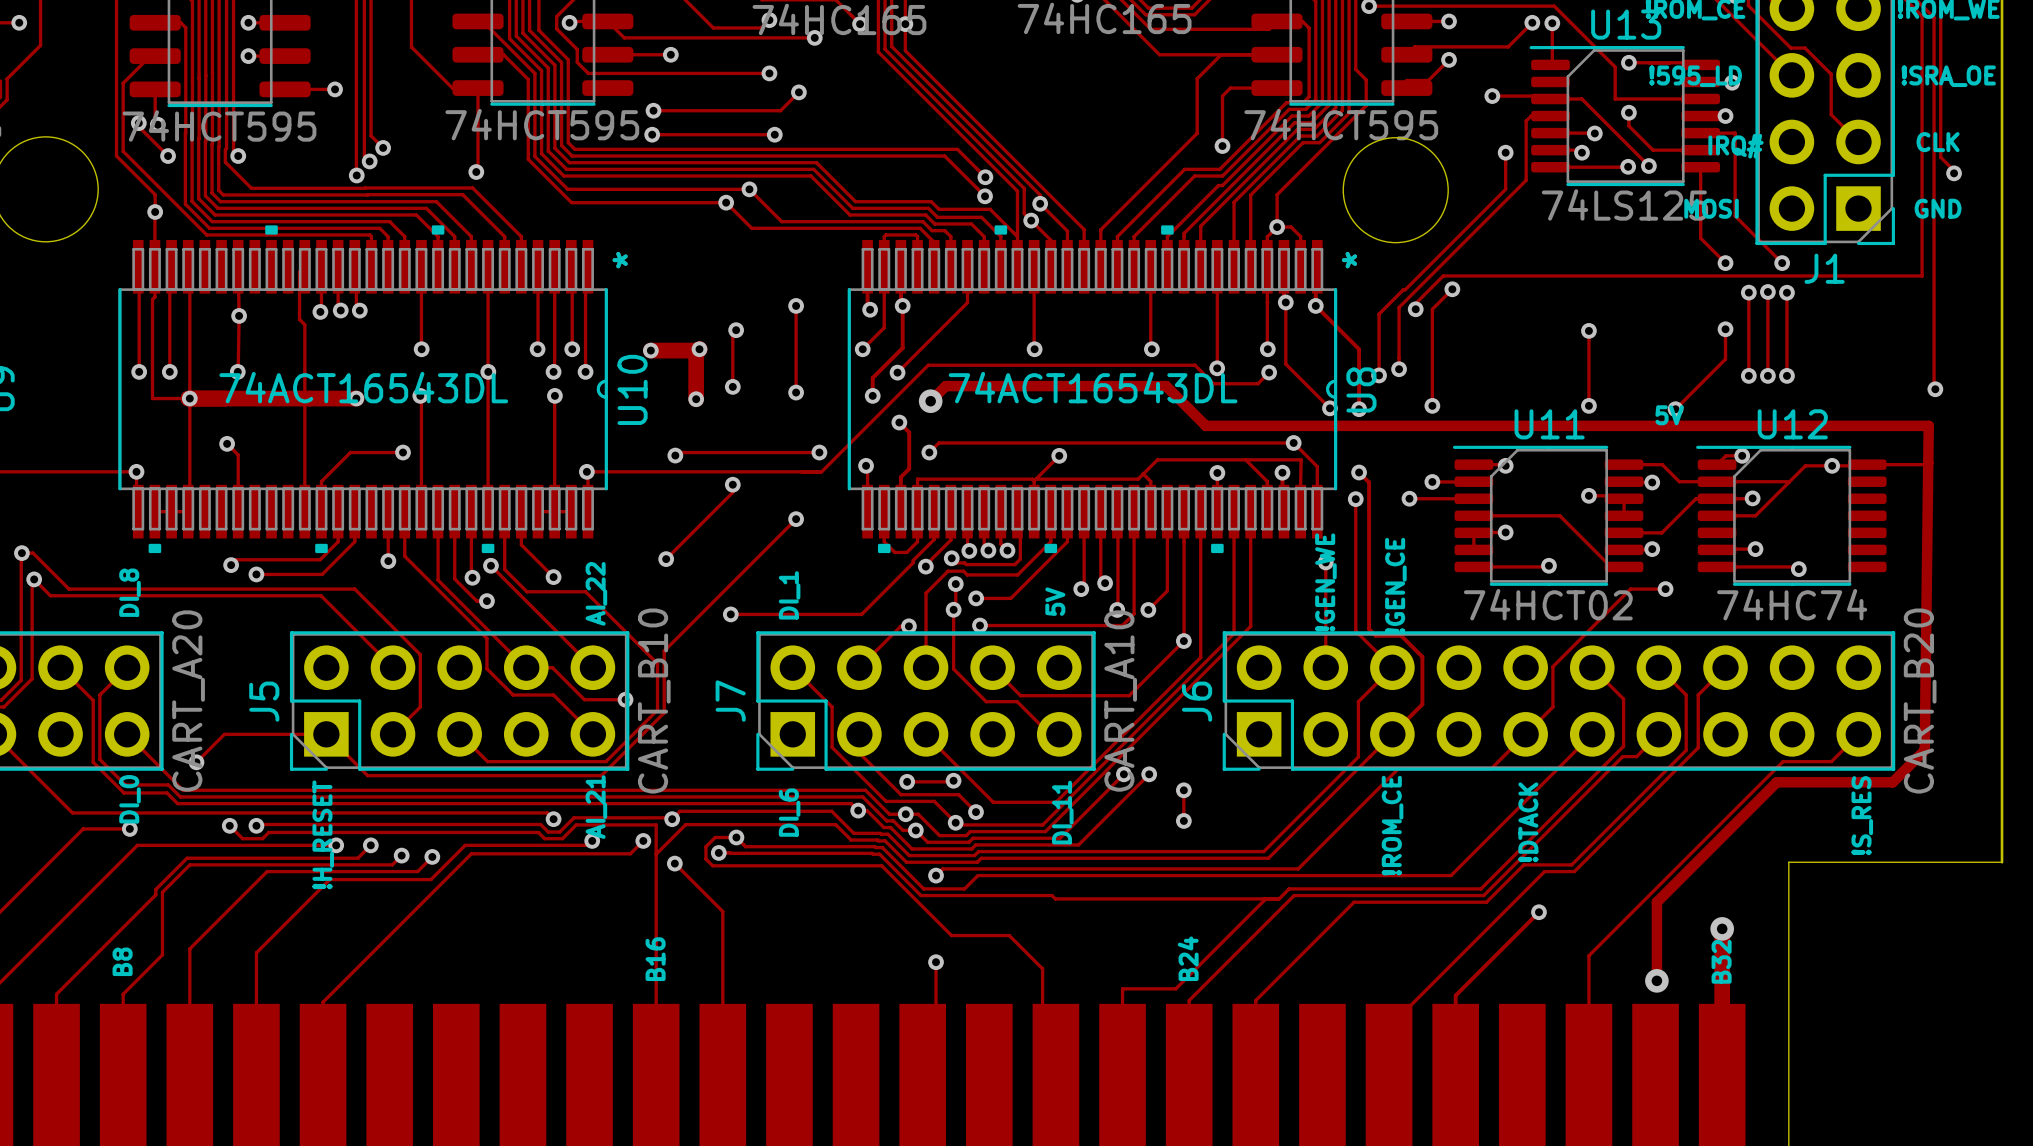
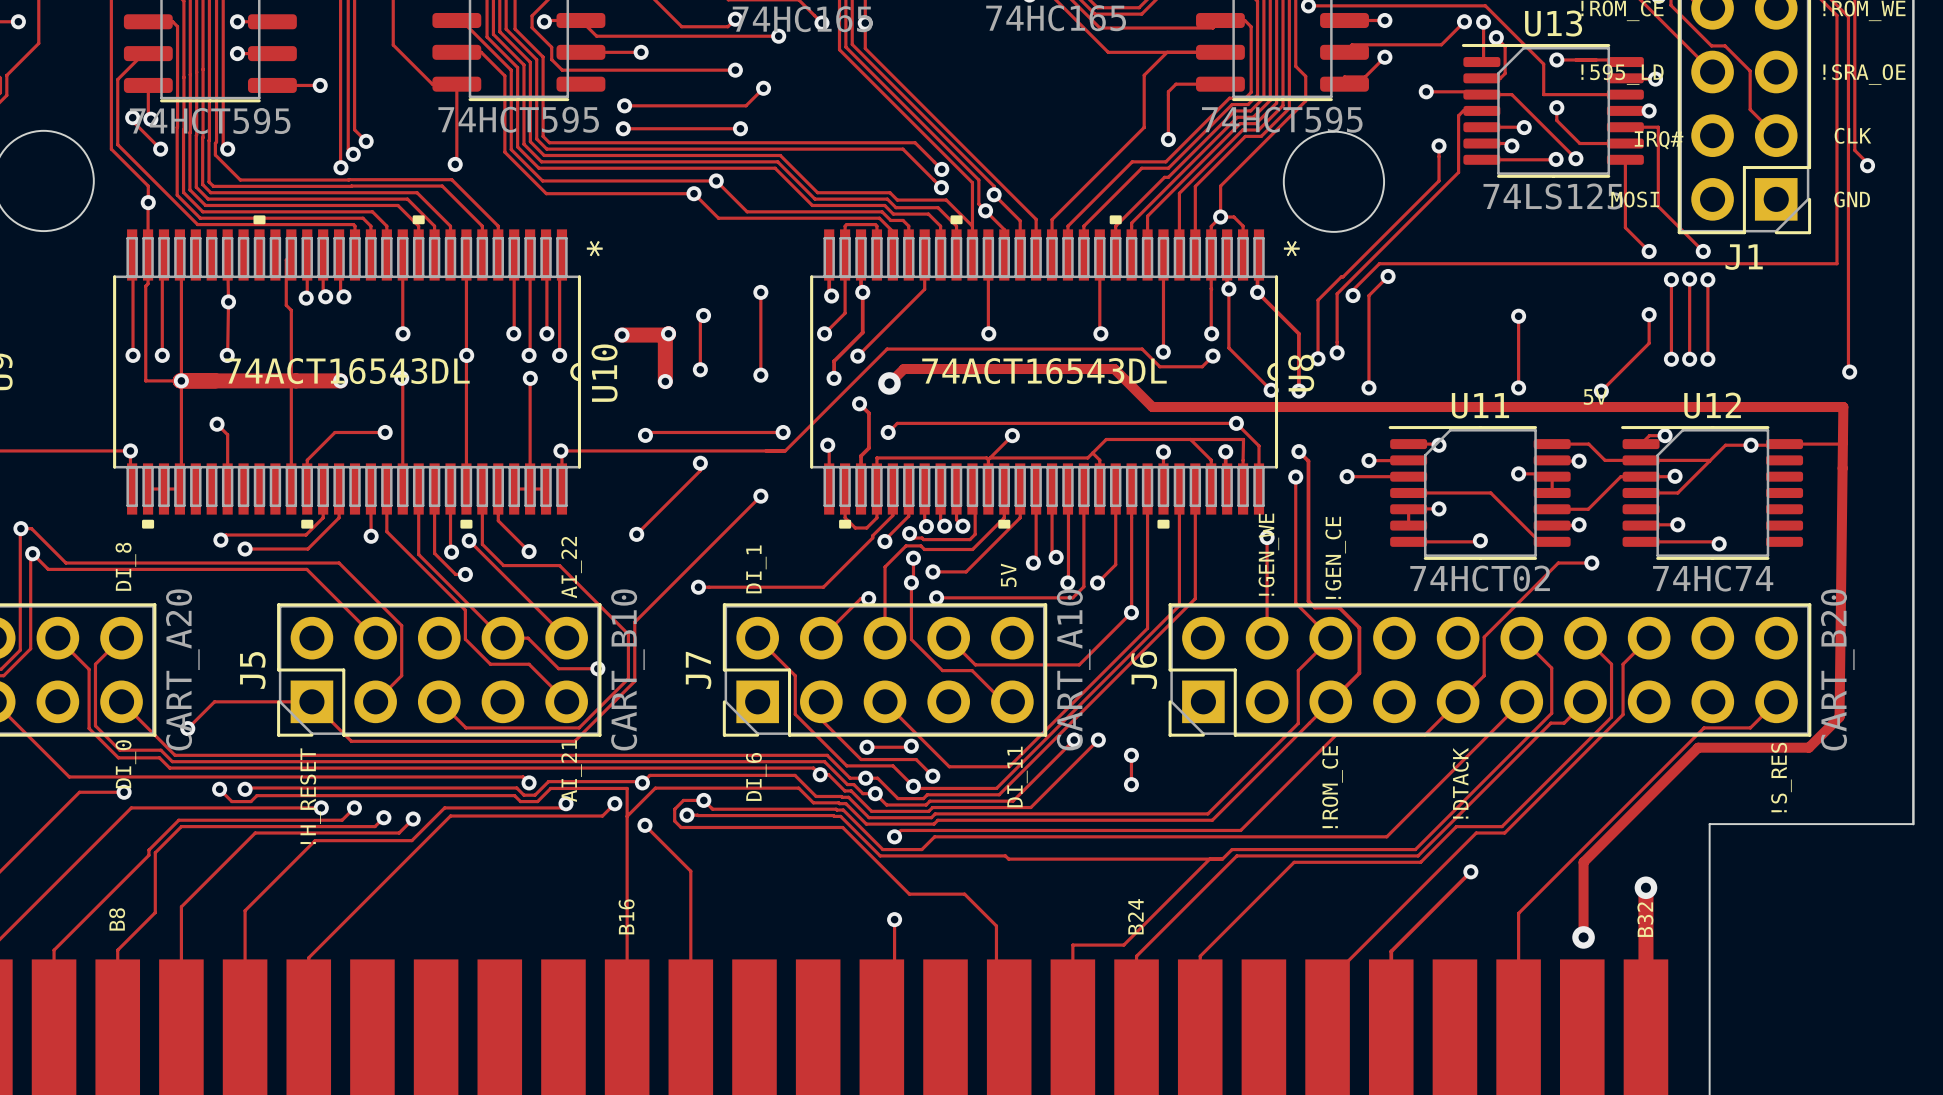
track: none -> (1496, 37) (1505, 46) (1505, 73) (1500, 78) (1481, 78)
via: none -> (1496, 37)

